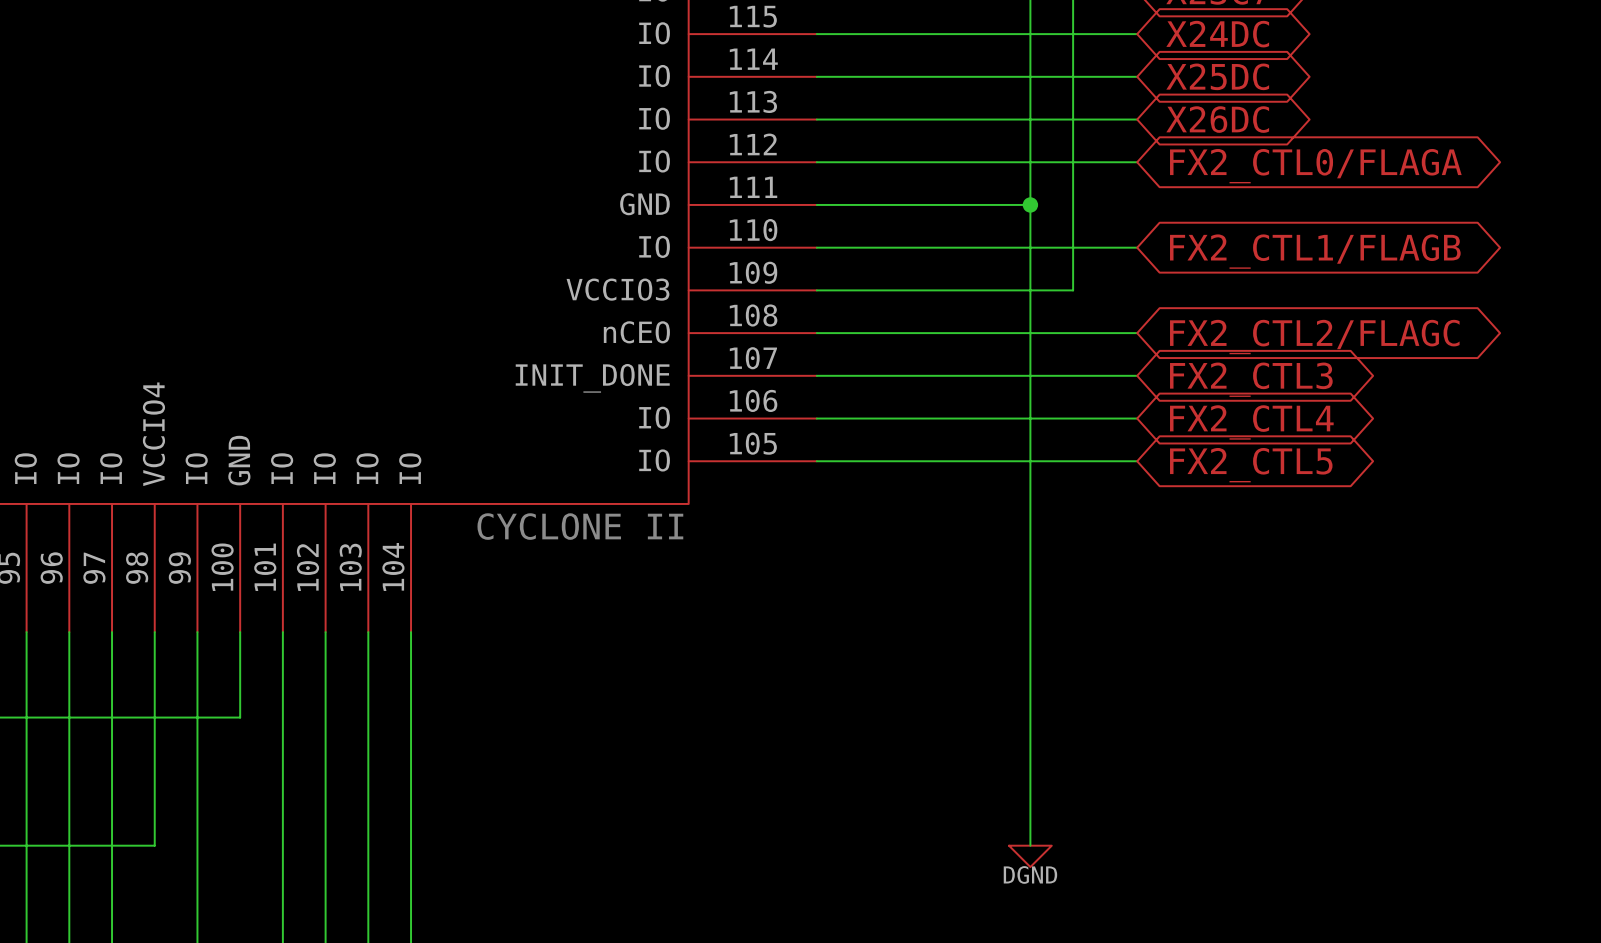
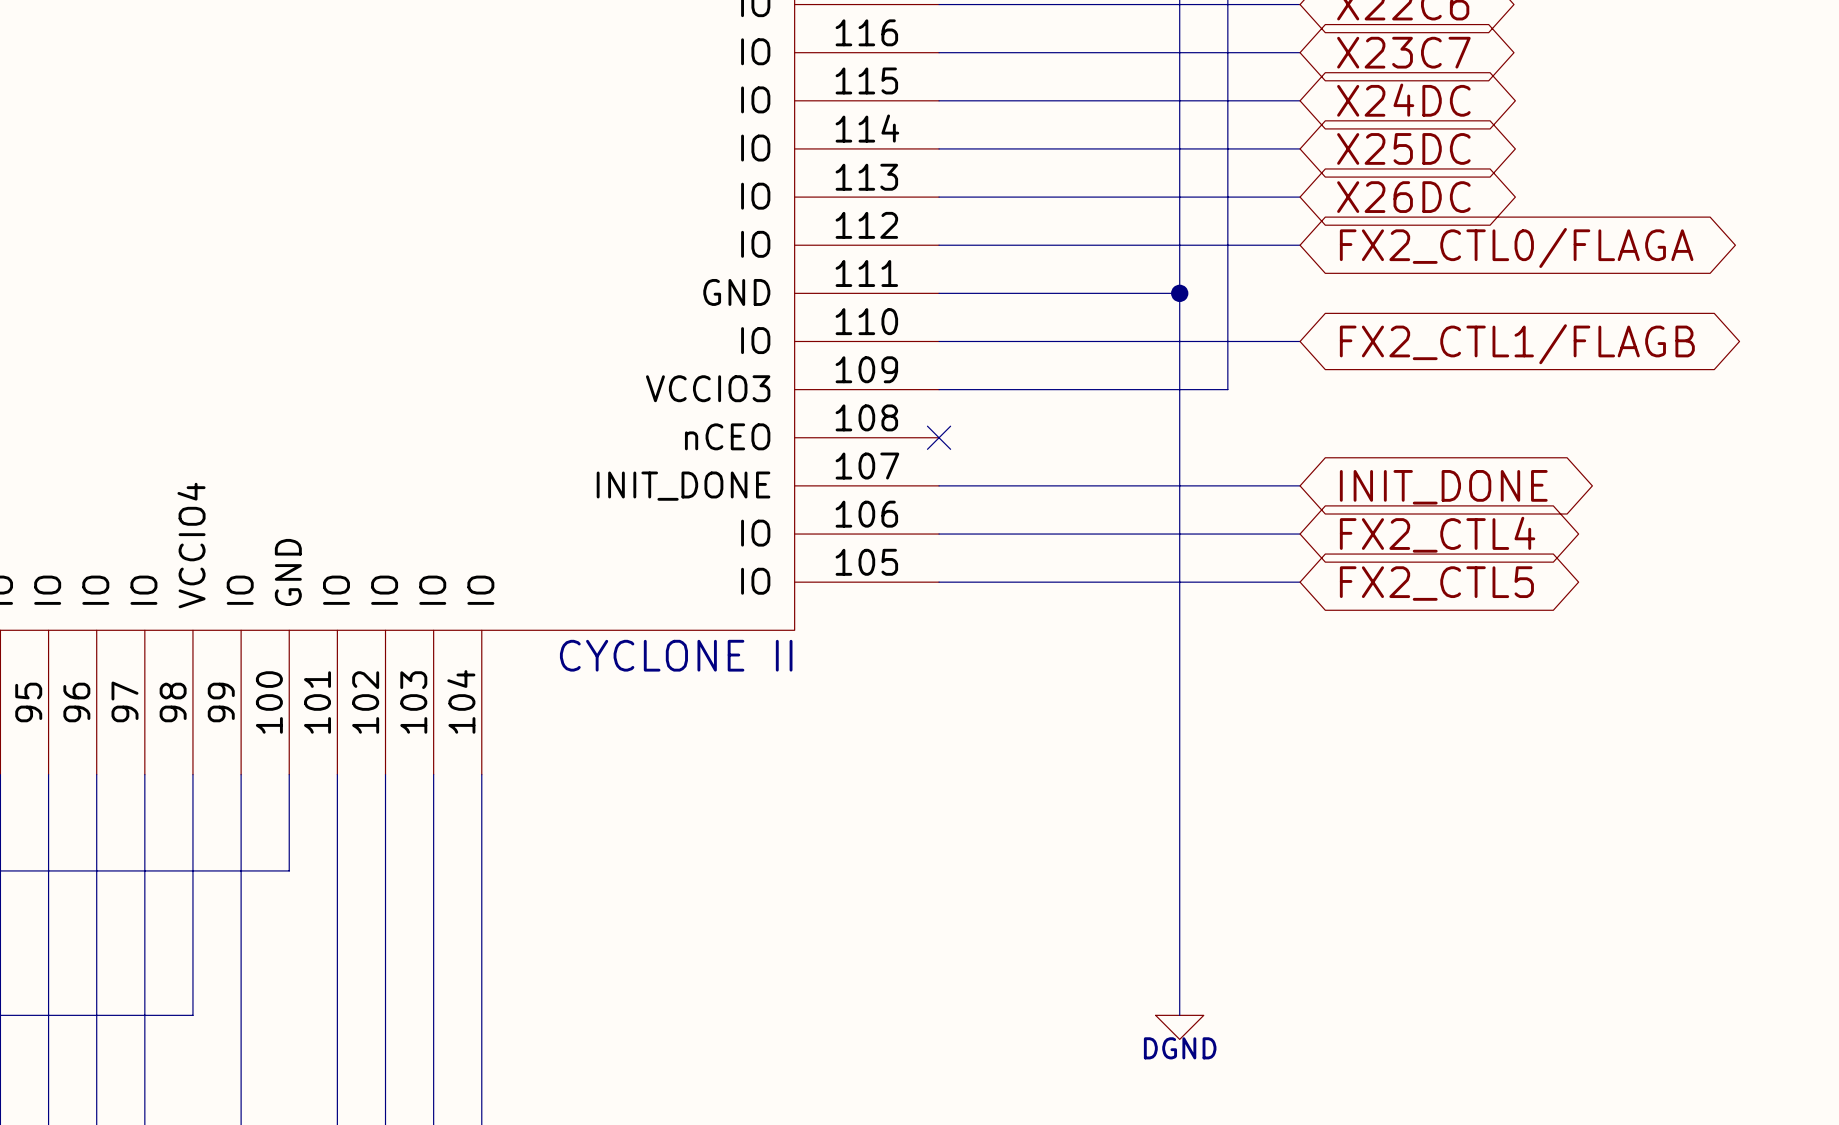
wire: (816, 333) (1137, 333) -> none
no-connect mark: none -> (939, 437)
global label: FX2_CTL2/FLAGC (1314, 337) -> none
global label: FX2_CTL3 (1251, 379) -> INIT_DONE (1443, 487)

